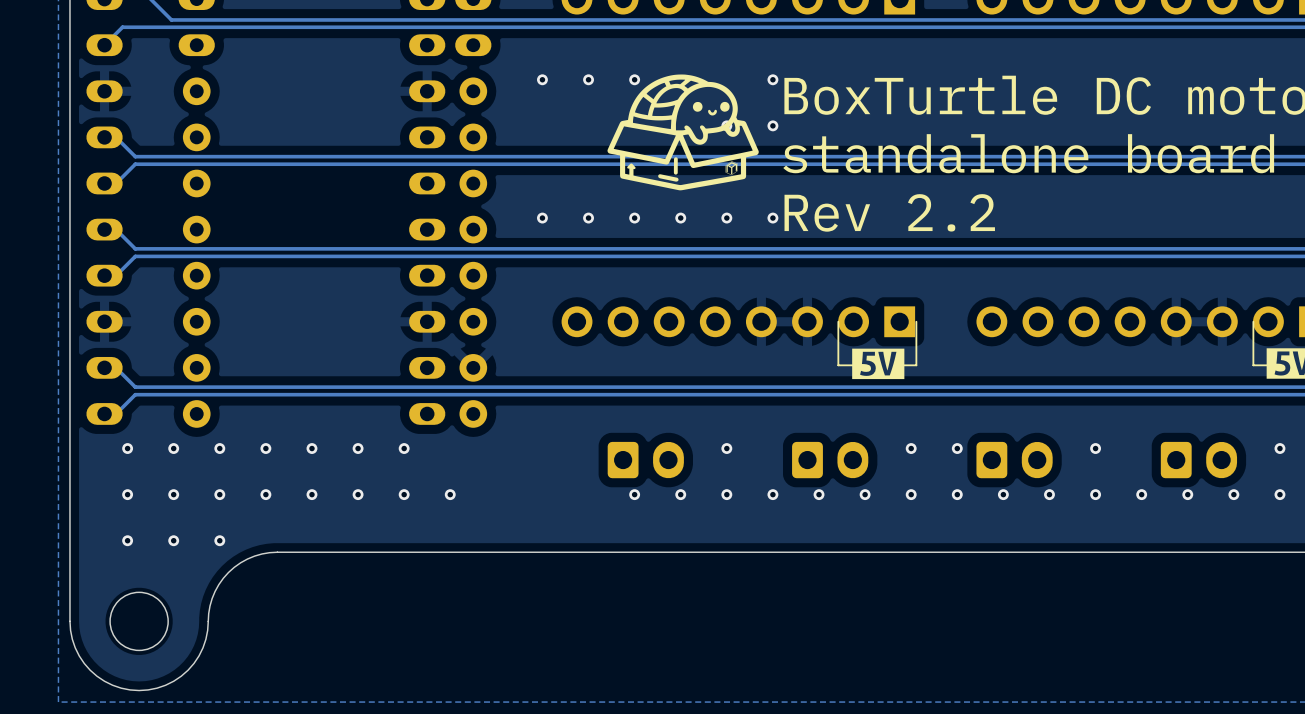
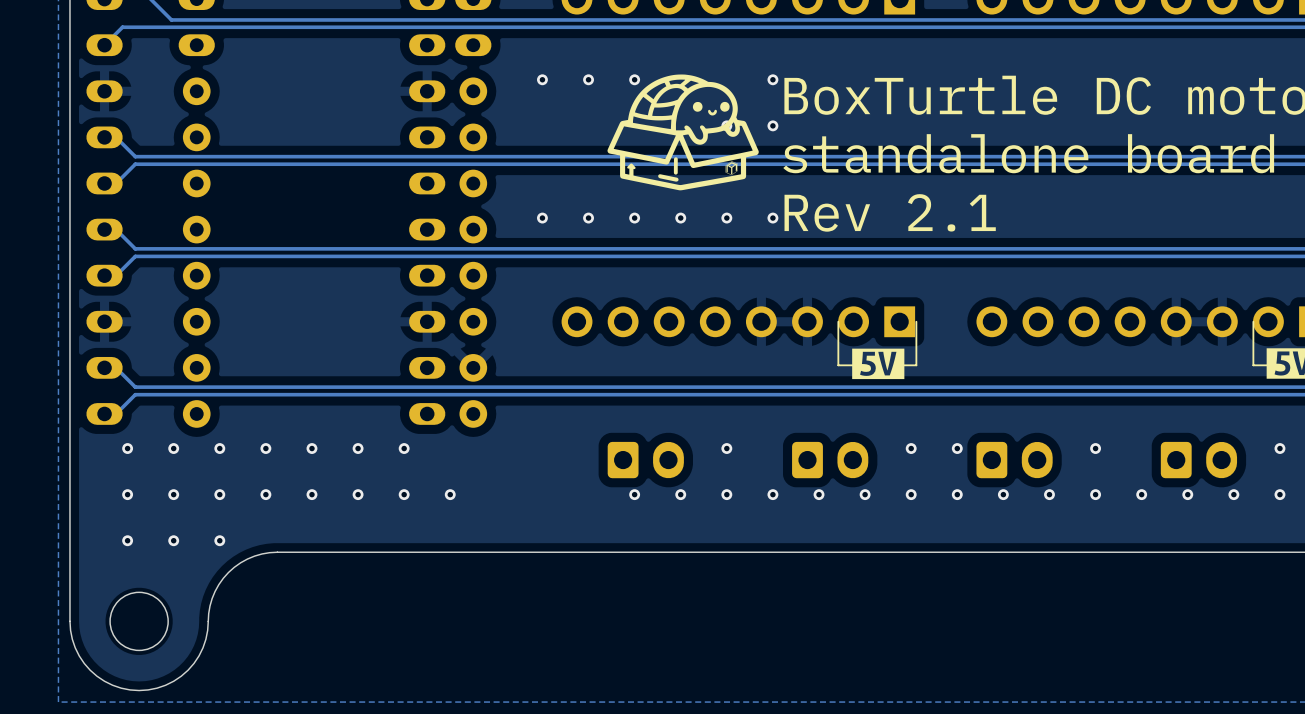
text: Rev 2.2 (889, 212) -> Rev 2.1 (890, 212)

